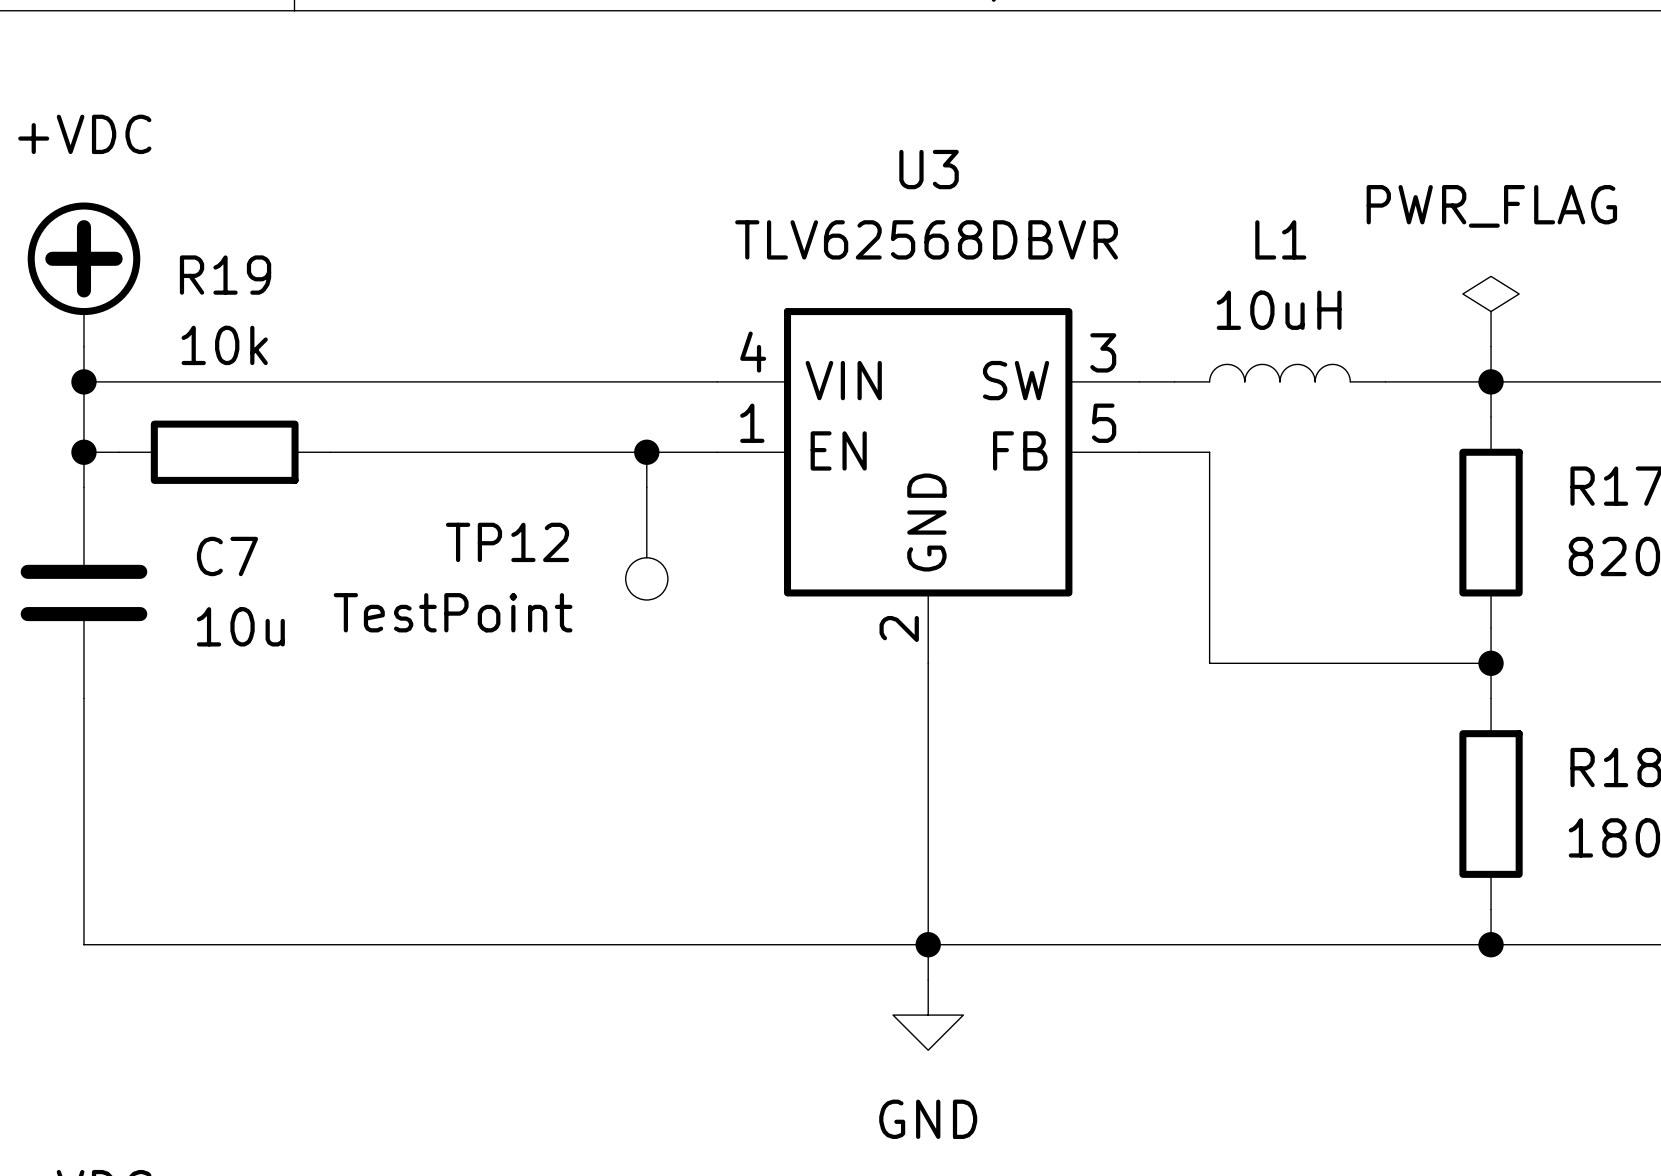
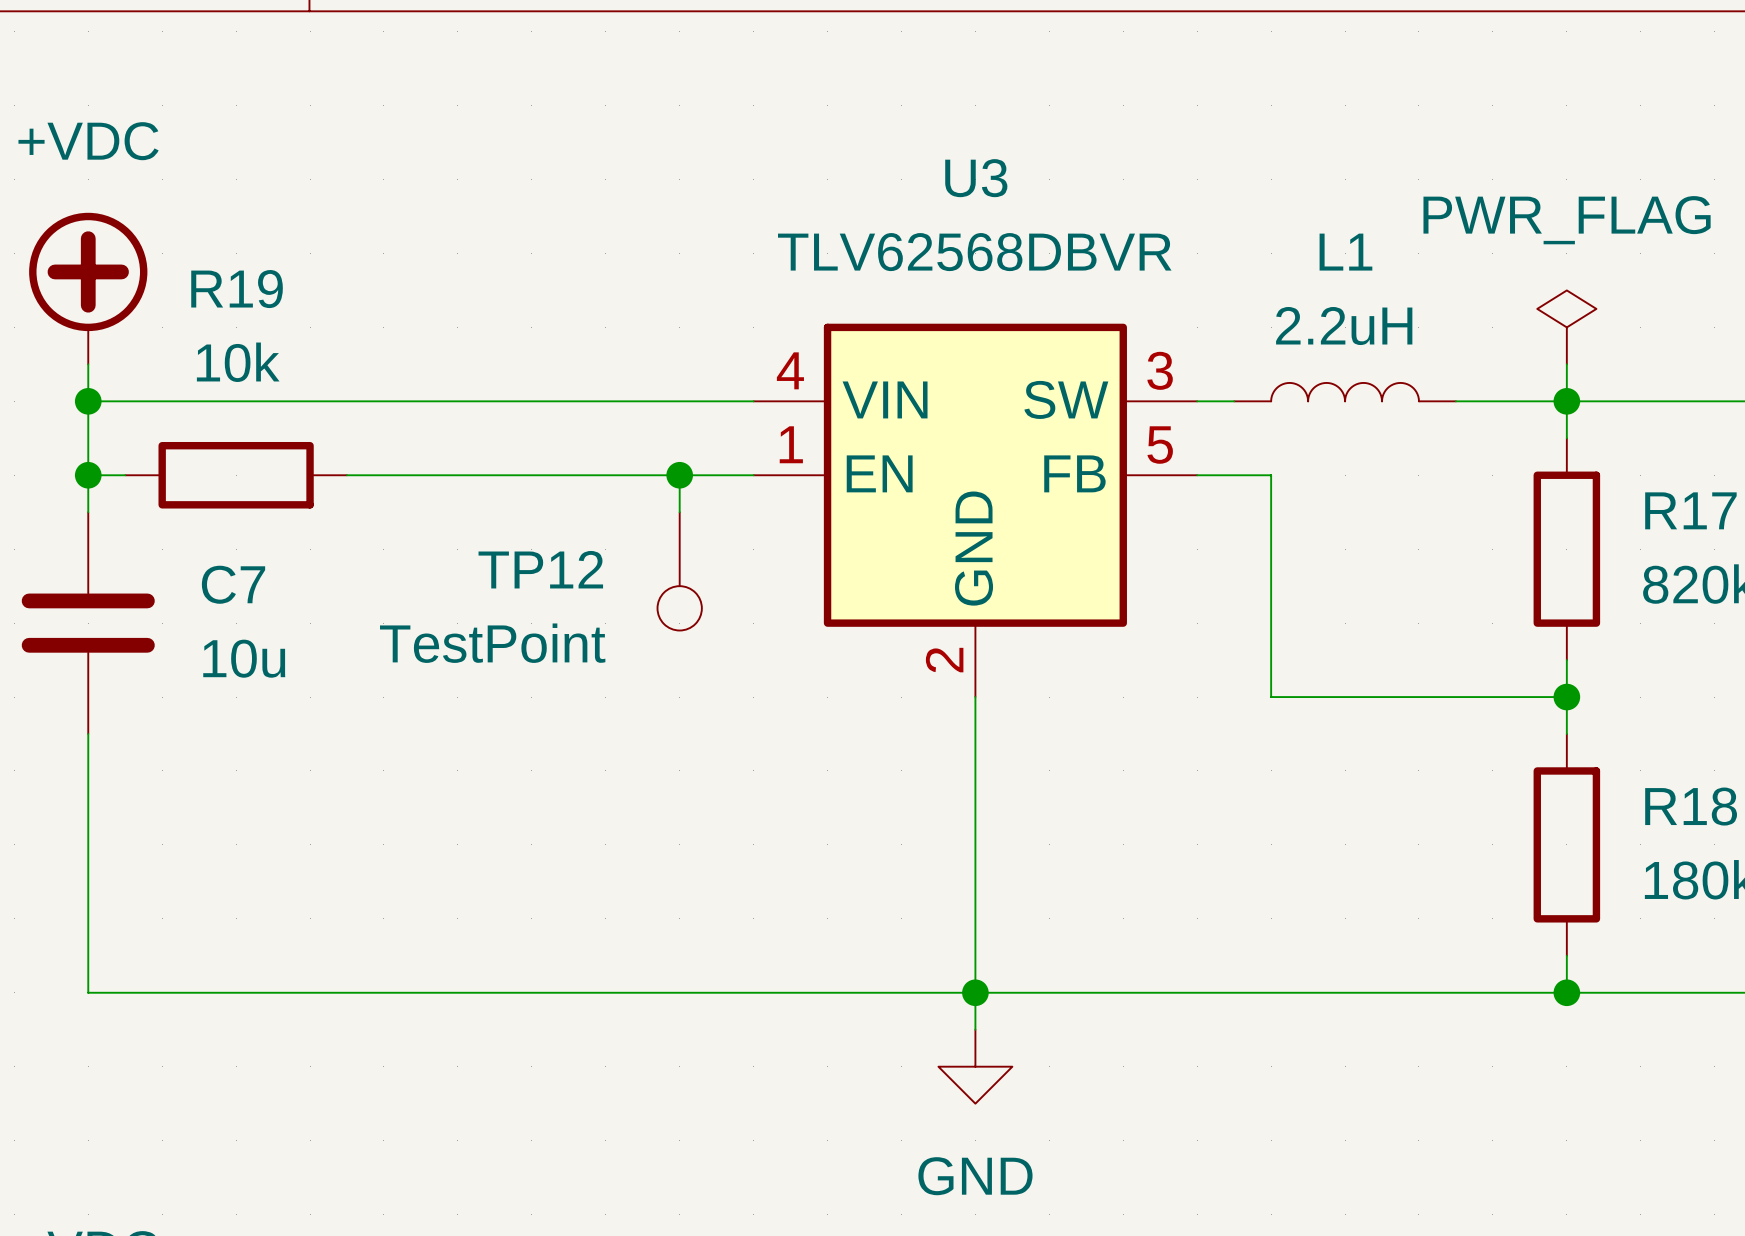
L1 value: 10uH (1279, 310) -> 2.2uH (1344, 326)

